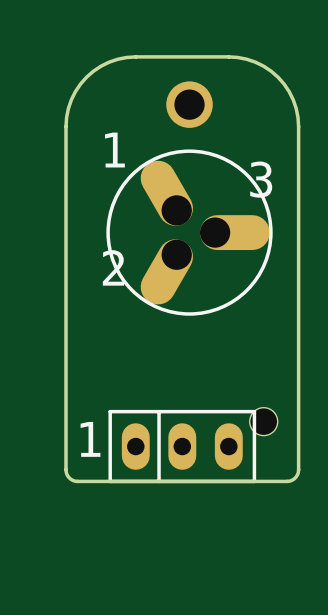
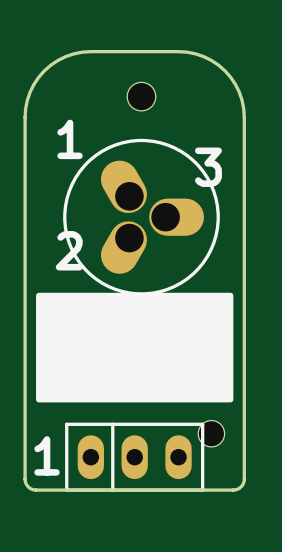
part footprint: [106, 81, 273, 316] -> [63, 82, 220, 296]
drawing: none -> [36, 292, 234, 403]
text position: 1 (90, 439) -> 1 (47, 455)
part position: (193, 445) -> (144, 456)
board edge: (66, 469) (69, 478) (77, 481) (286, 481) (295, 478) (298, 469) -> (25, 440) (25, 481) (29, 487) (36, 490) (236, 489) (241, 486) (244, 480) (244, 440)

